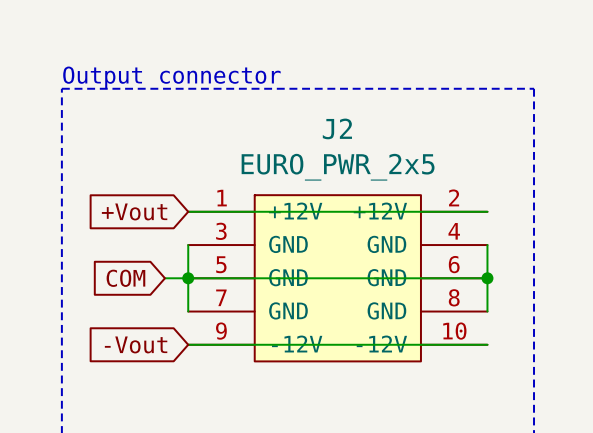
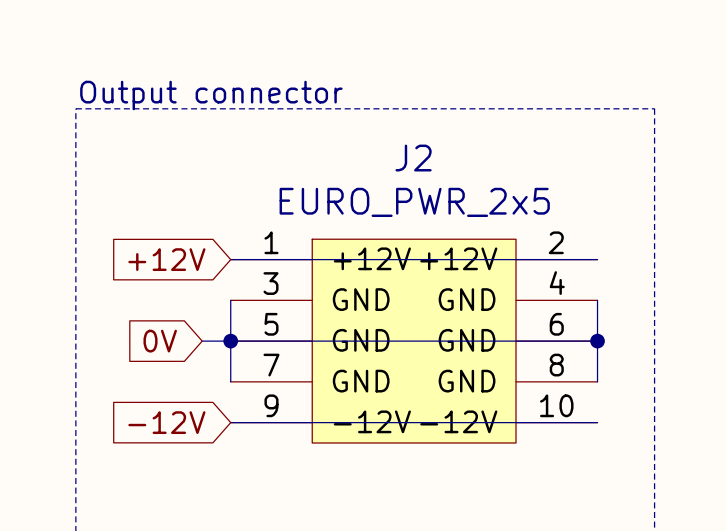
global label: +Vout (134, 211) -> +12V (166, 259)
global label: COM (125, 278) -> 0V (160, 341)
global label: -Vout (136, 344) -> -12V (166, 422)

